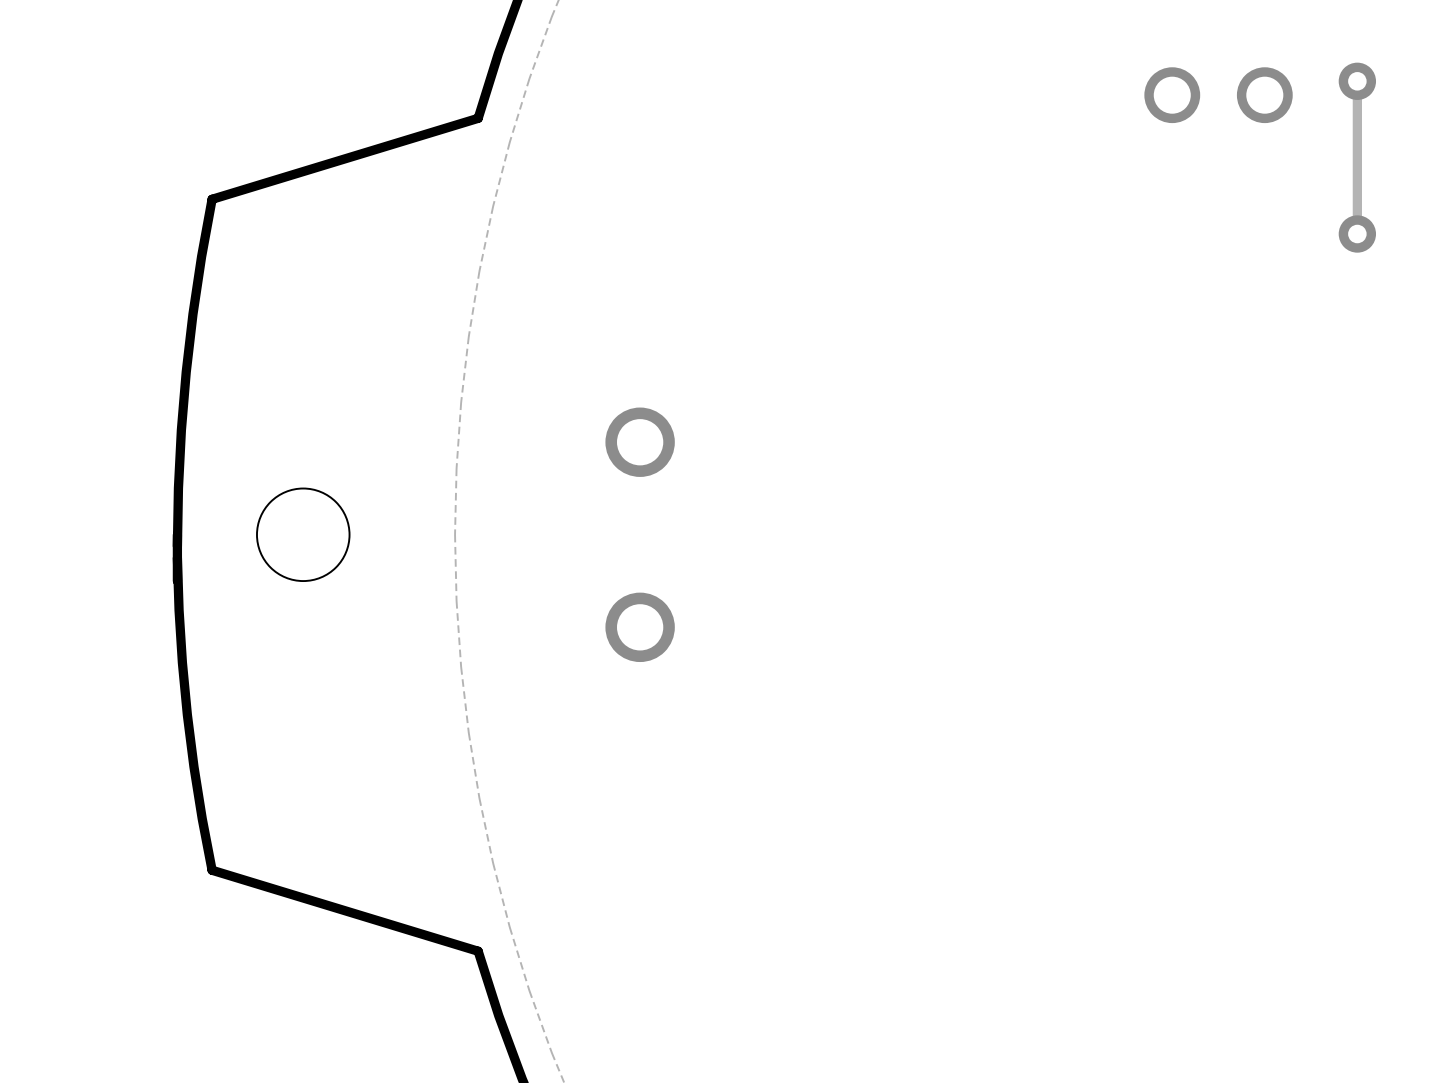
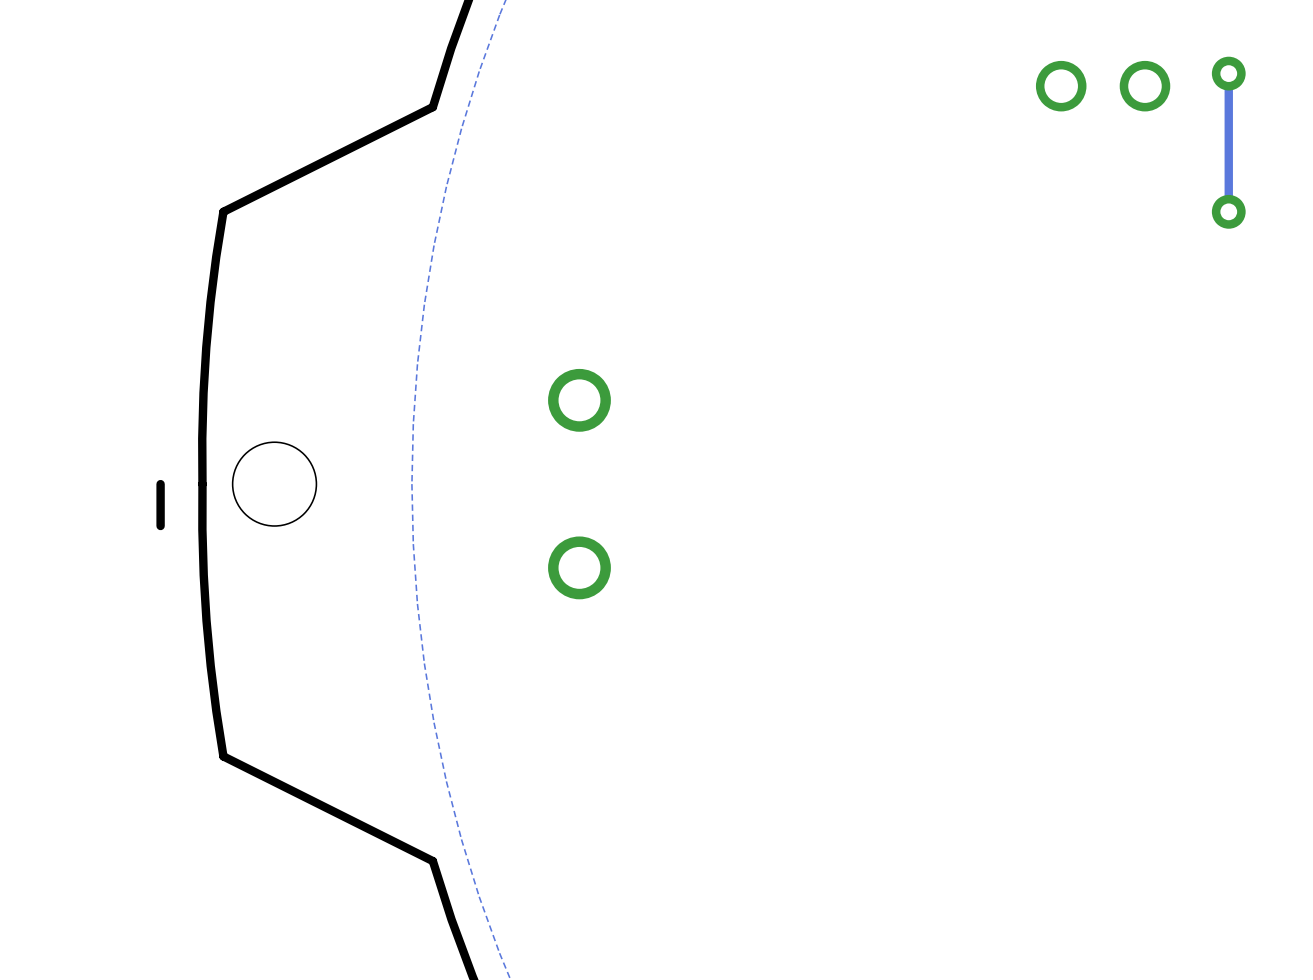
board edge: (478, 118) (212, 199) (192, 314) (186, 371) (178, 488) (177, 546) -> (432, 107) (223, 211) (206, 347) (202, 438) (202, 529) (206, 620) (223, 756) (432, 861)
board edge: (177, 557) (179, 610) (187, 714) (202, 818) (212, 870) (478, 951) -> none

